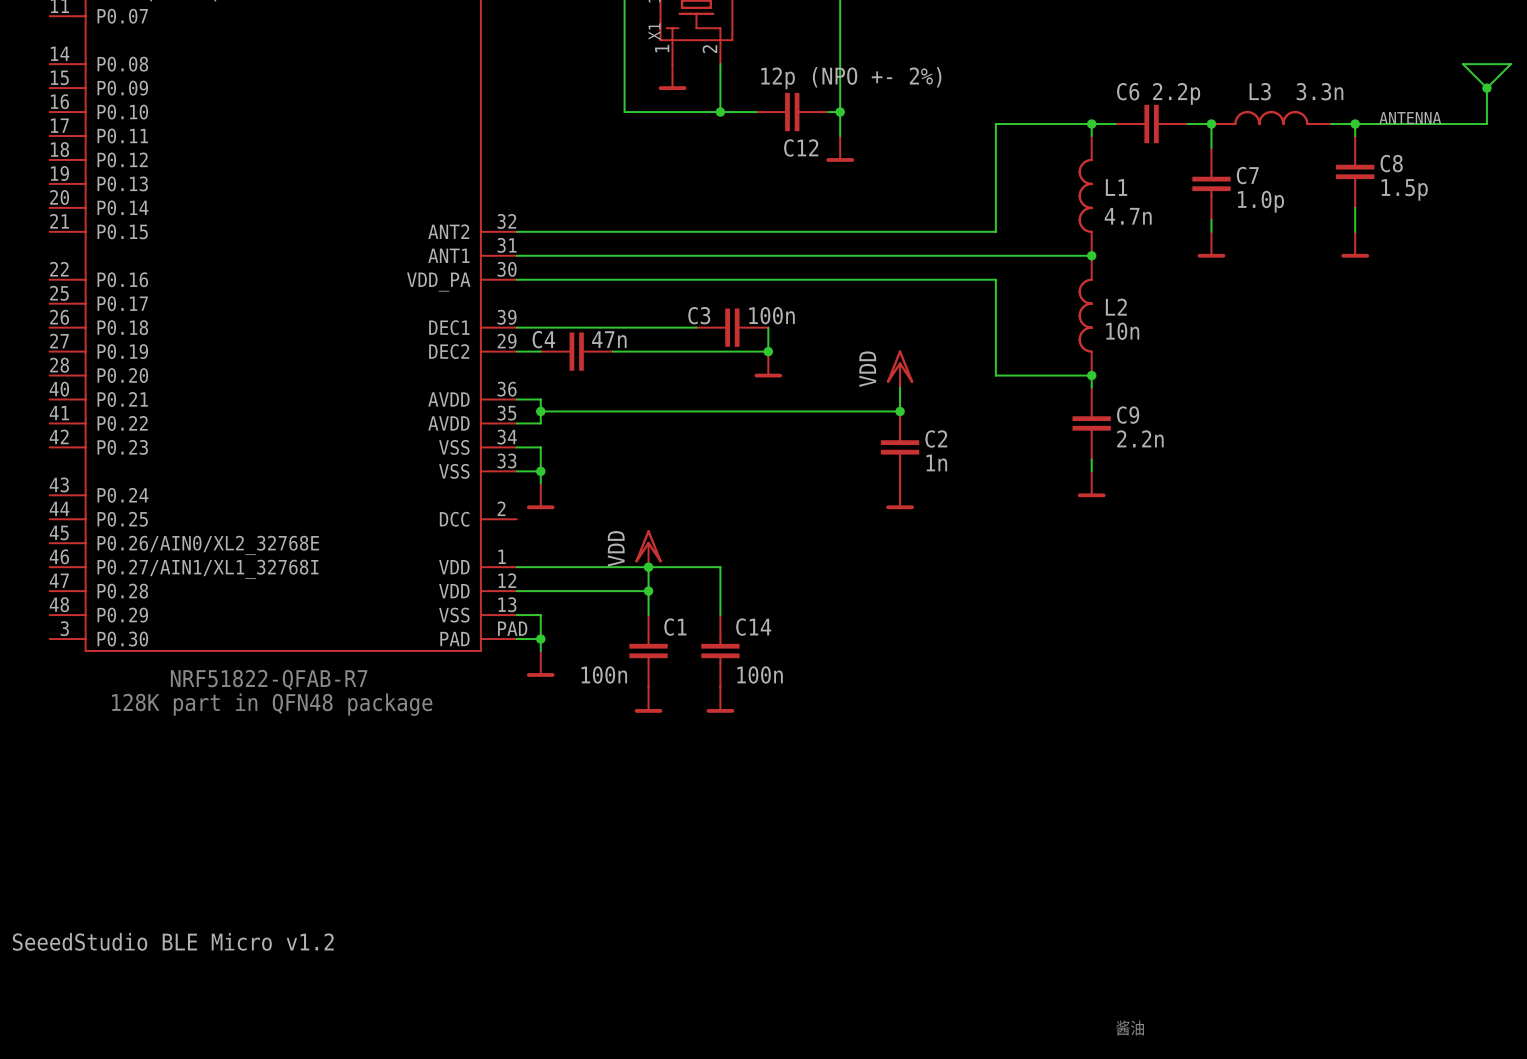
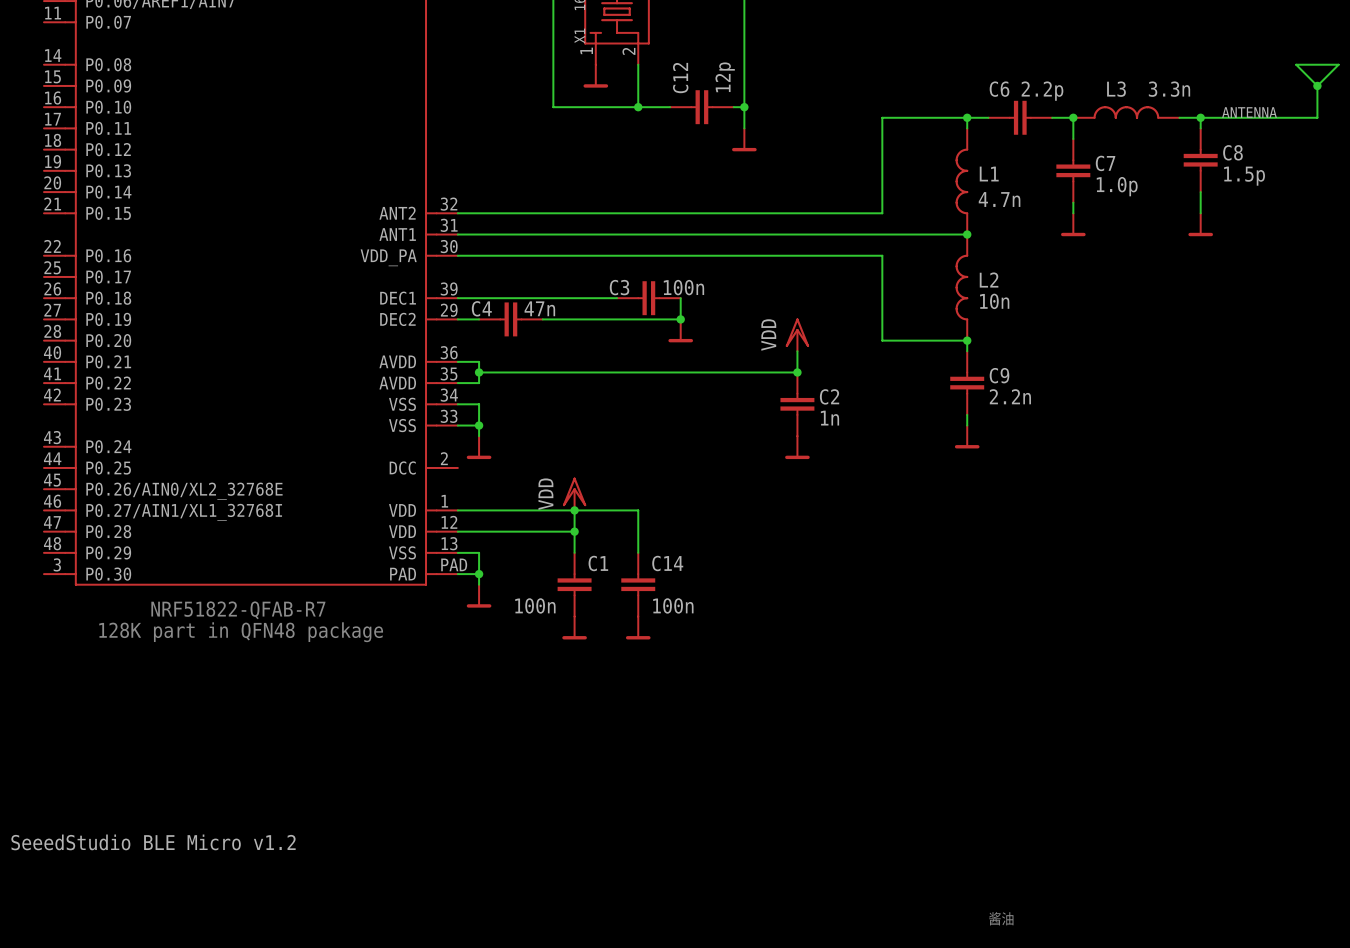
C12 value: 12p (NPO +- 2%) (851, 78) -> 12p (725, 77)
C12 name rotation: 0° (801, 148) -> 90° counterclockwise (680, 78)
C12 name position: C12 (801, 148) -> C12 (680, 78)

